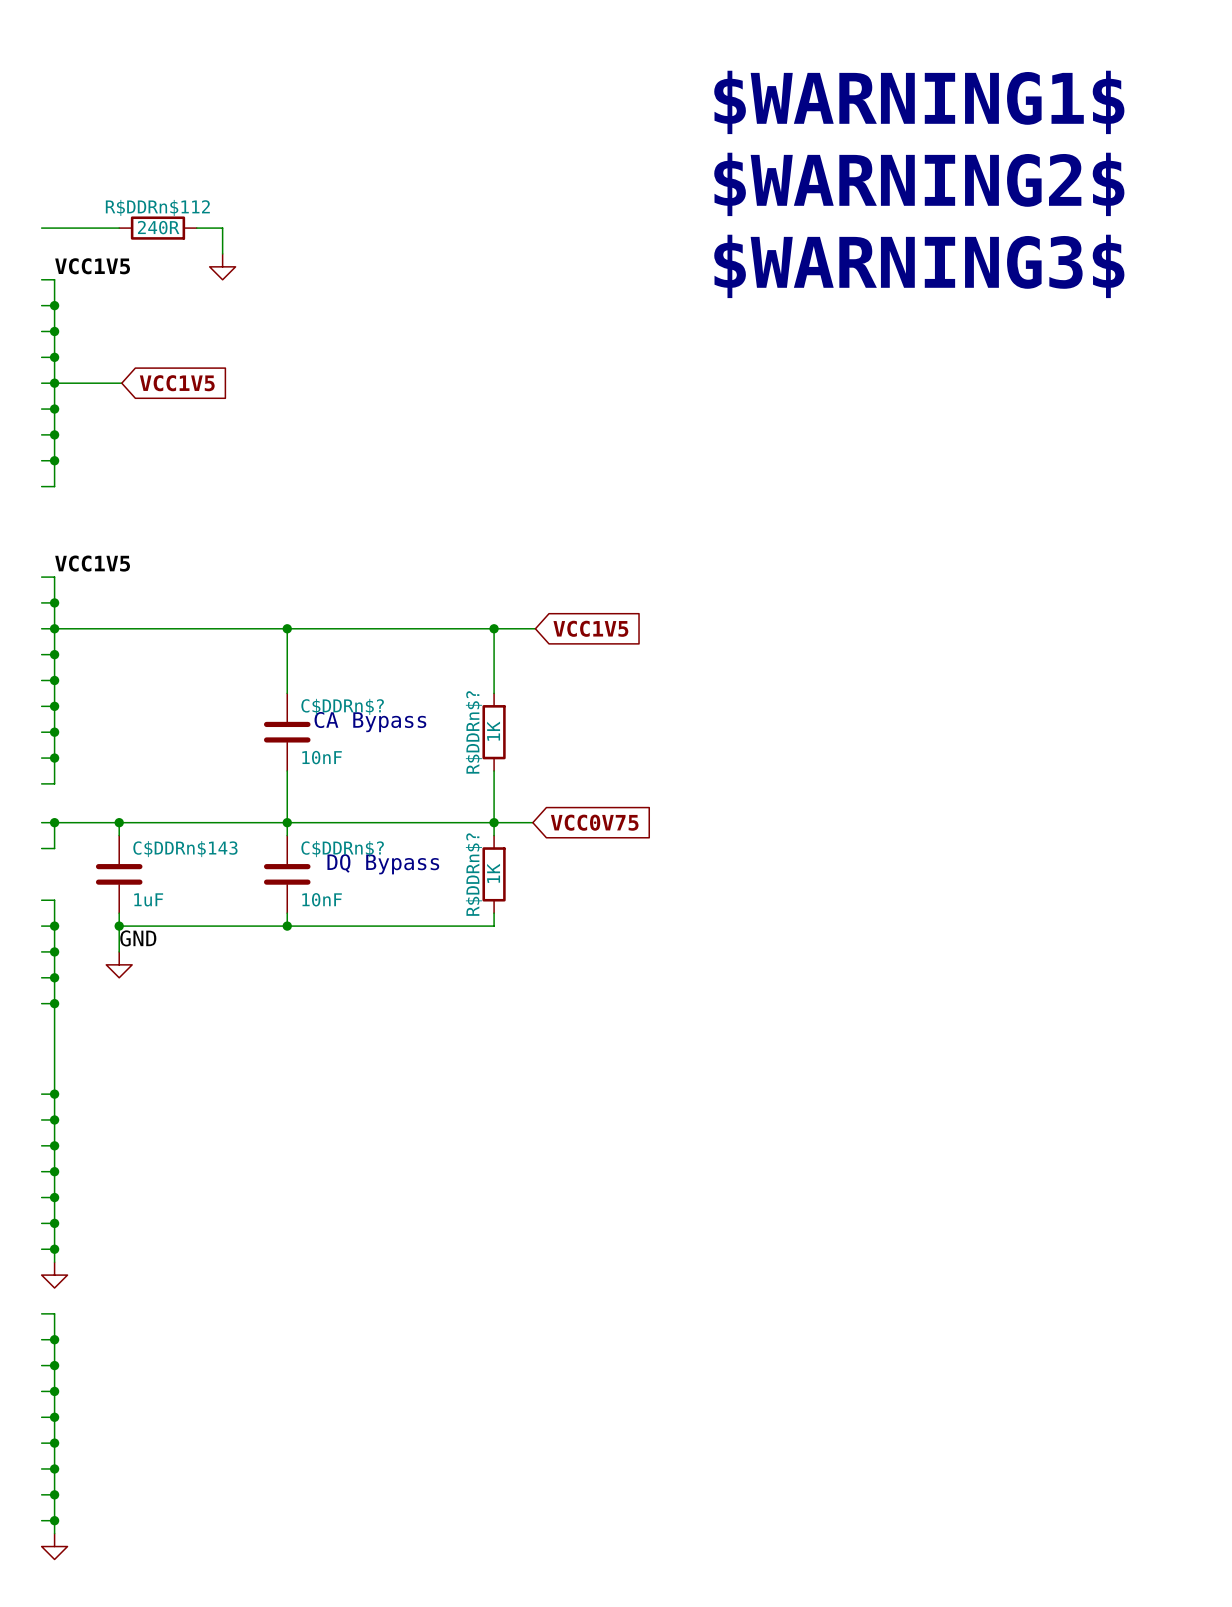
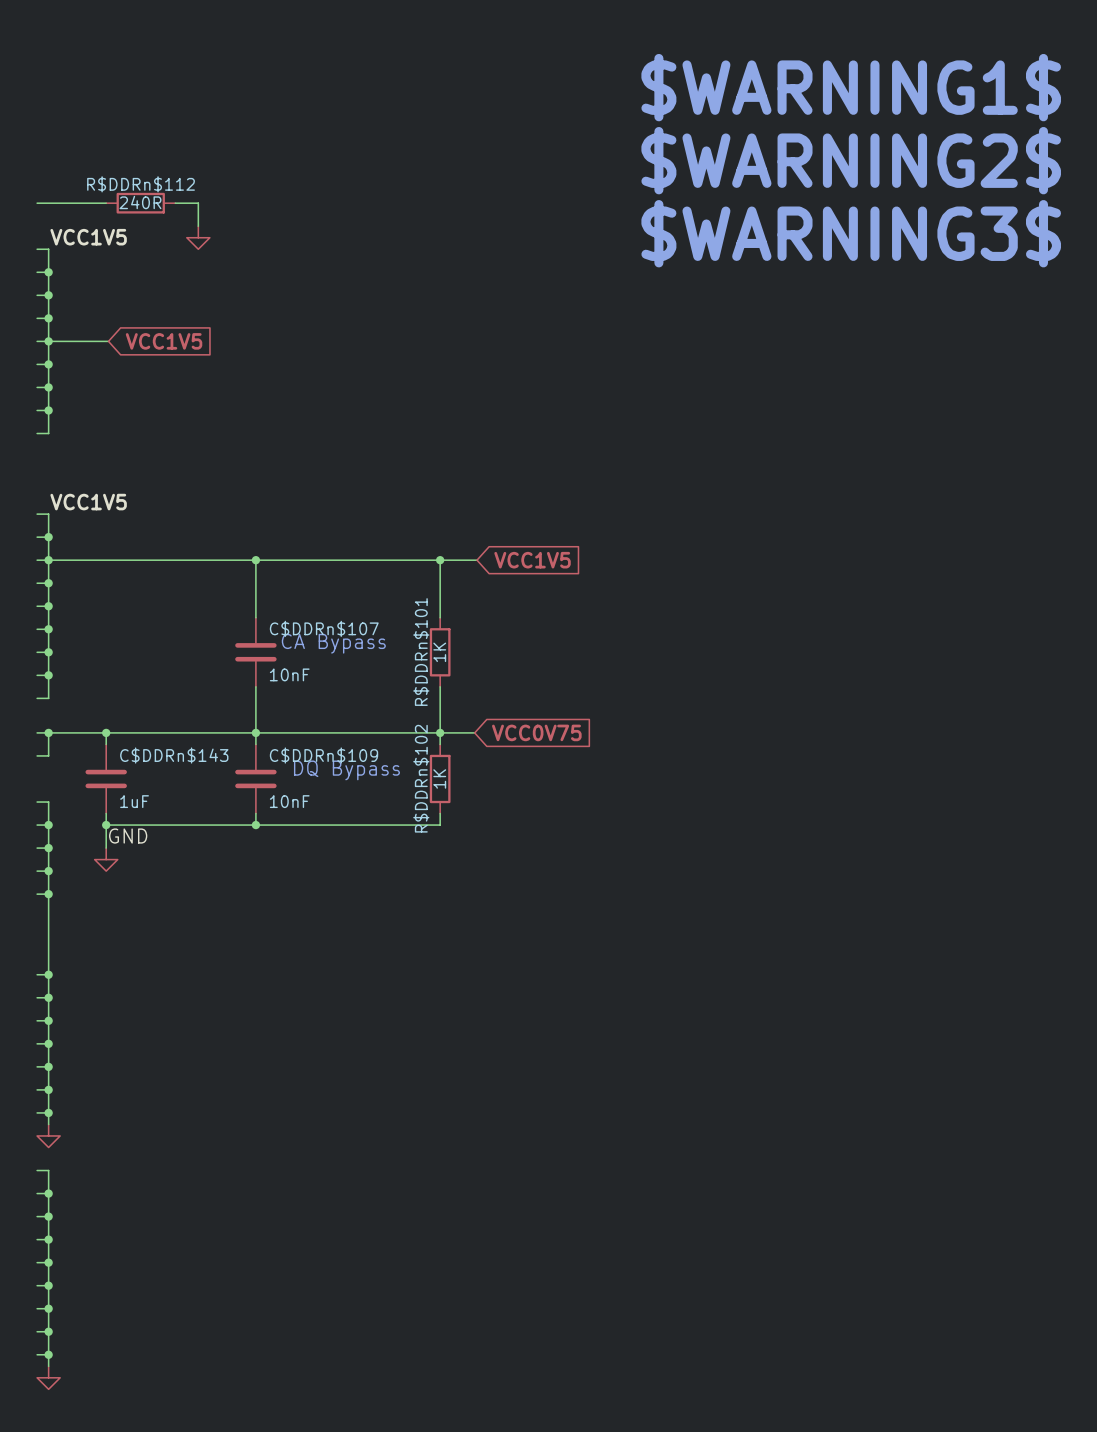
C$DDRn$? name: C$DDRn$? (342, 706) -> C$DDRn$107 (324, 628)
R$DDRn$? name: R$DDRn$? (473, 732) -> R$DDRn$101 (421, 652)
C$DDRn$? name: C$DDRn$? (342, 849) -> C$DDRn$109 (323, 755)
R$DDRn$? name: R$DDRn$? (473, 874) -> R$DDRn$102 (421, 778)

